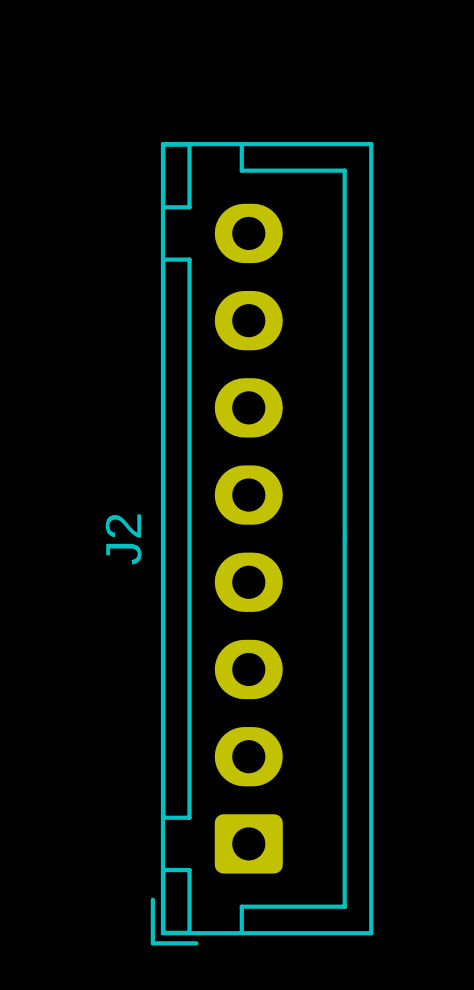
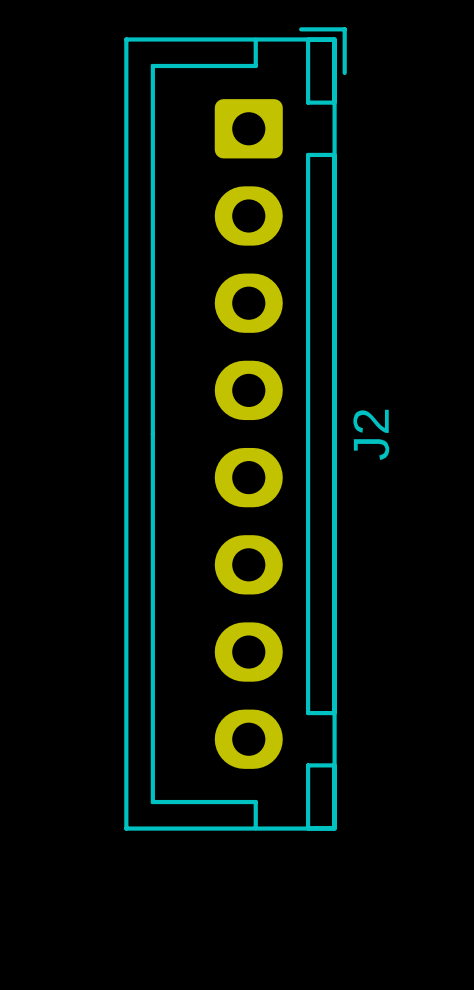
J2 rotation: 0° (262, 543) -> 180° (235, 428)

